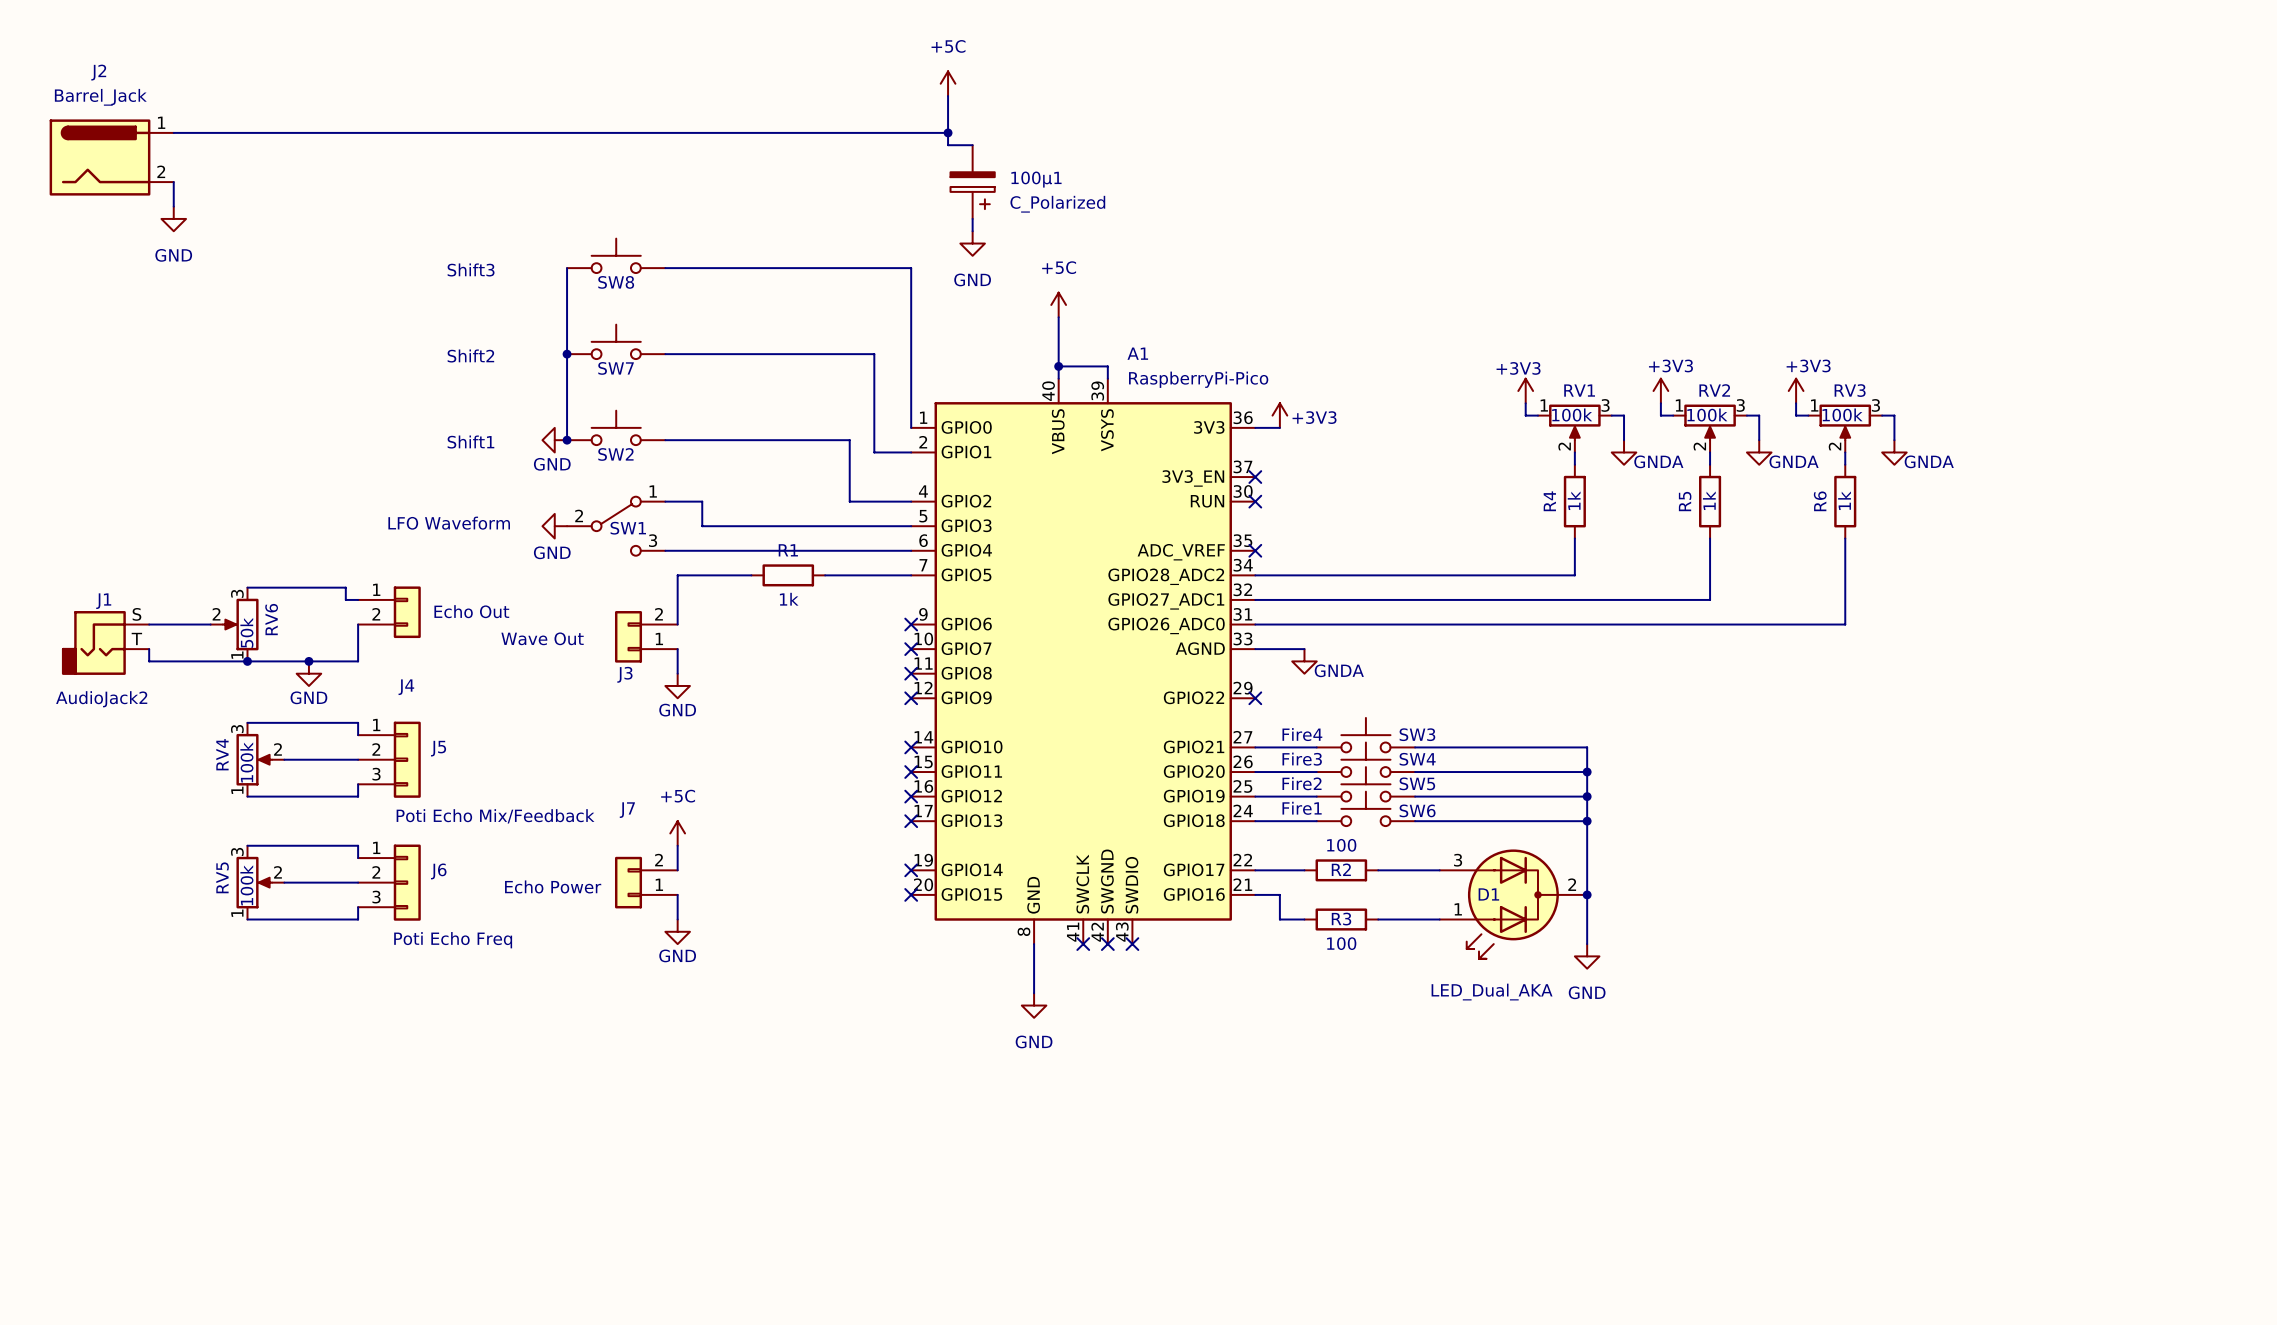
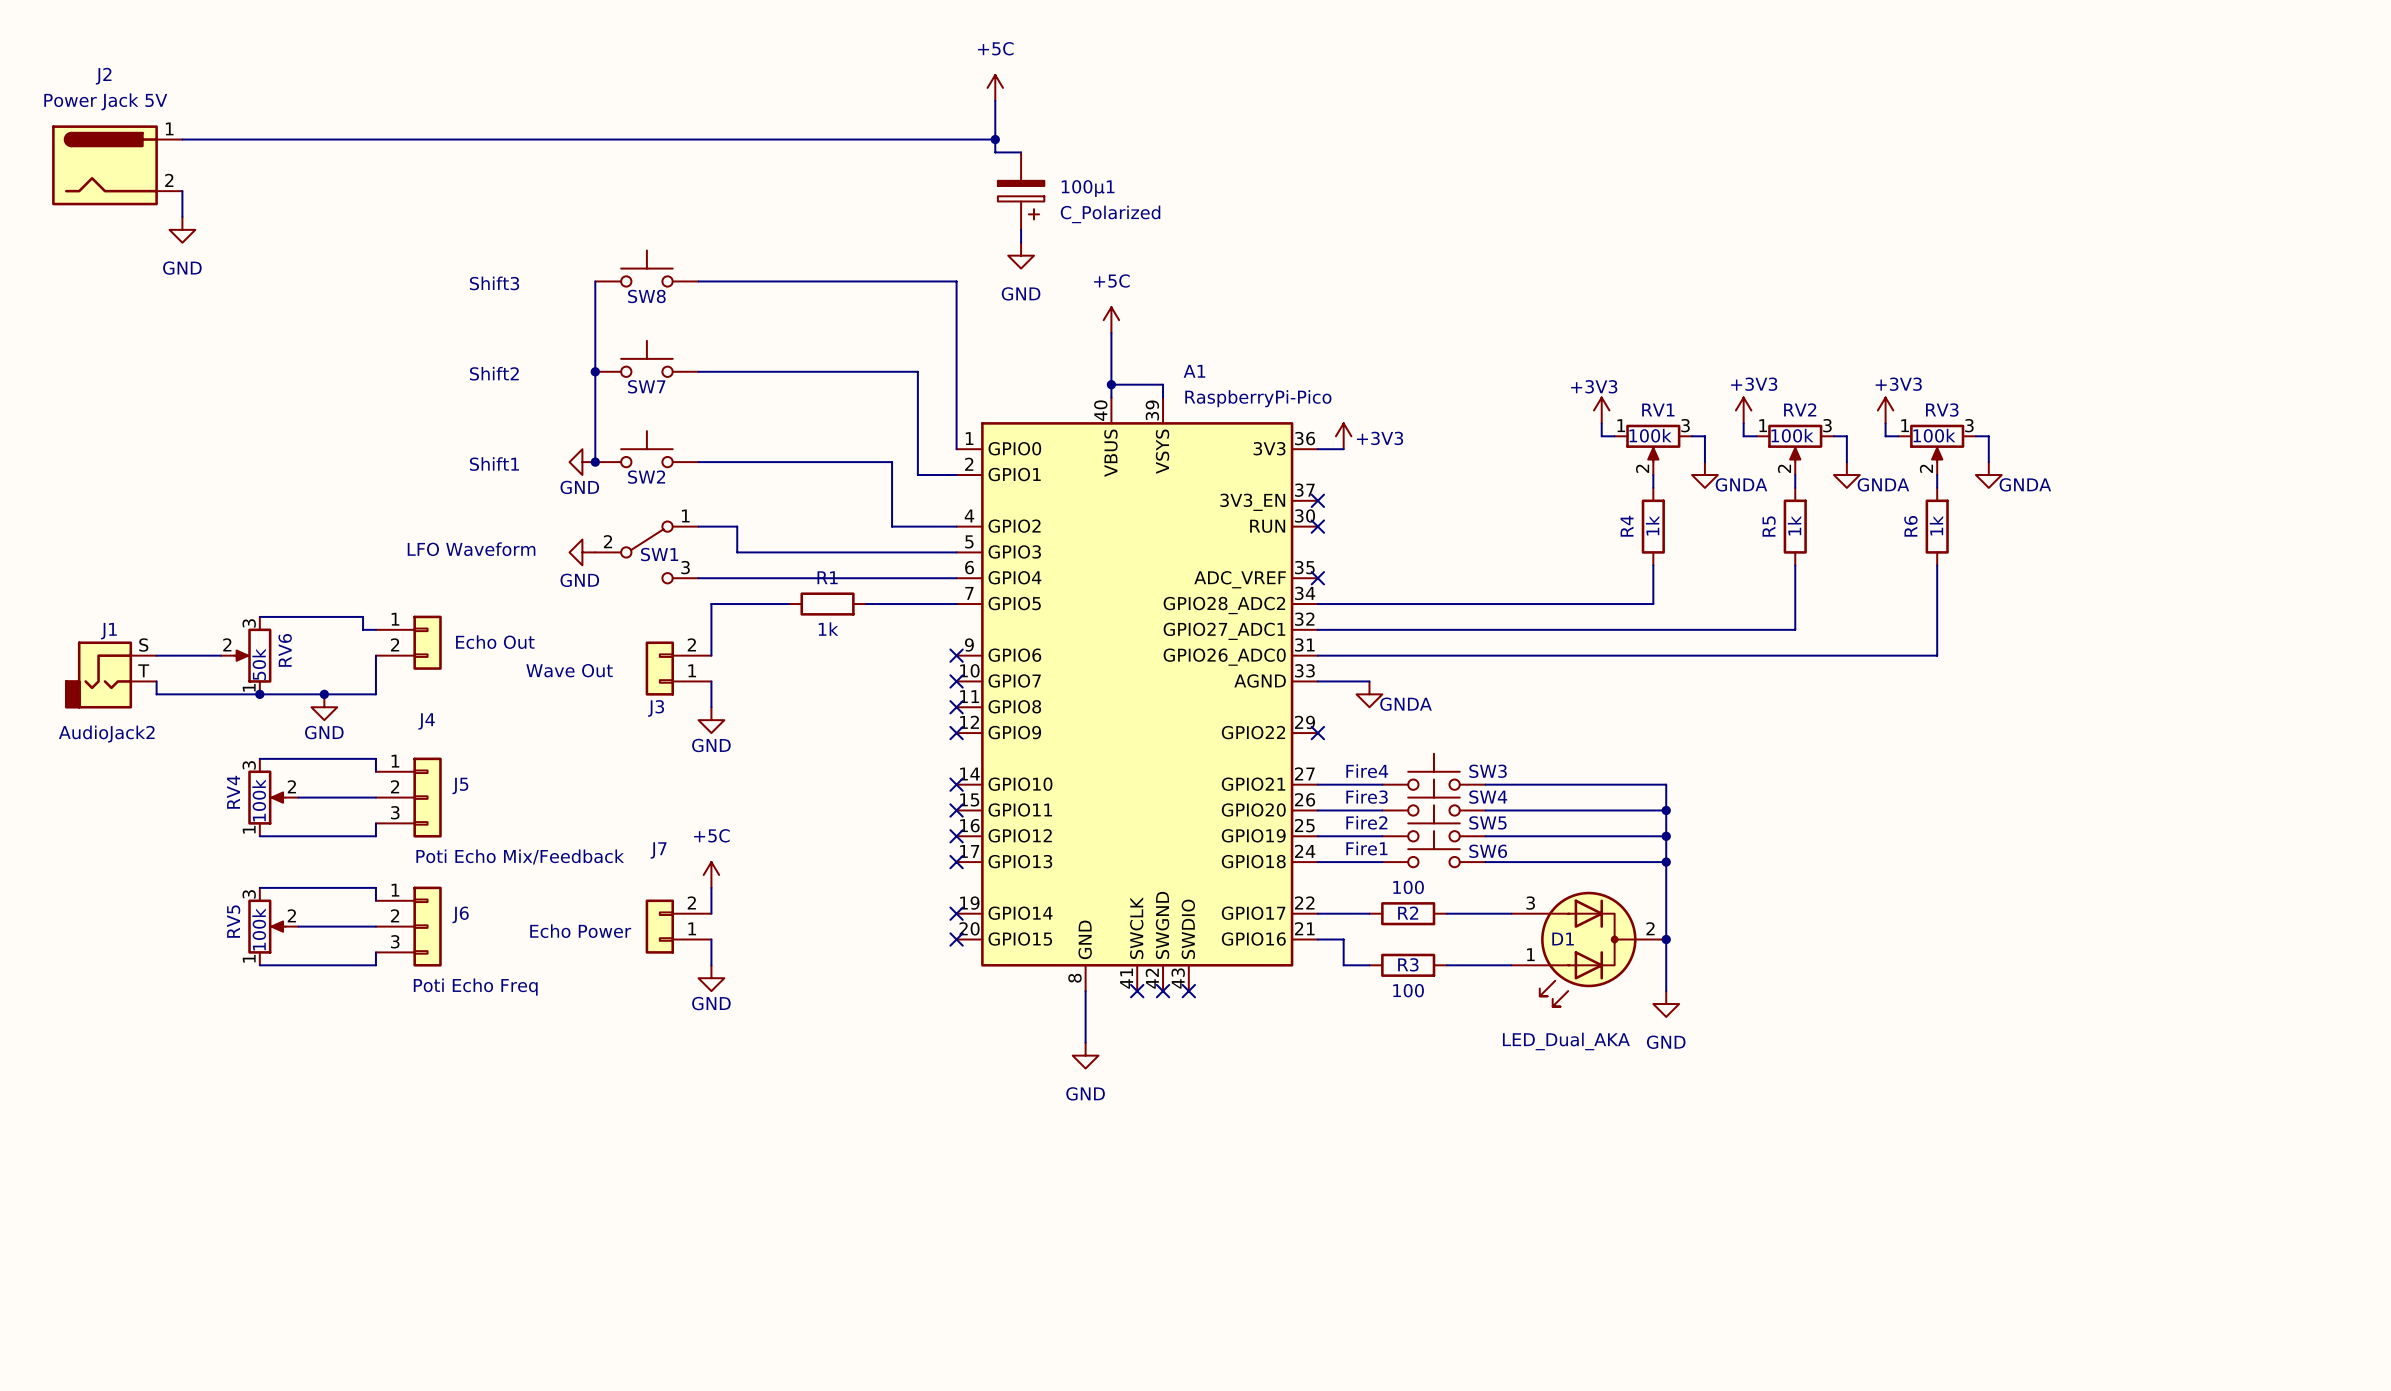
J2 value: Barrel_Jack (100, 97) -> Power Jack 5V (105, 101)

